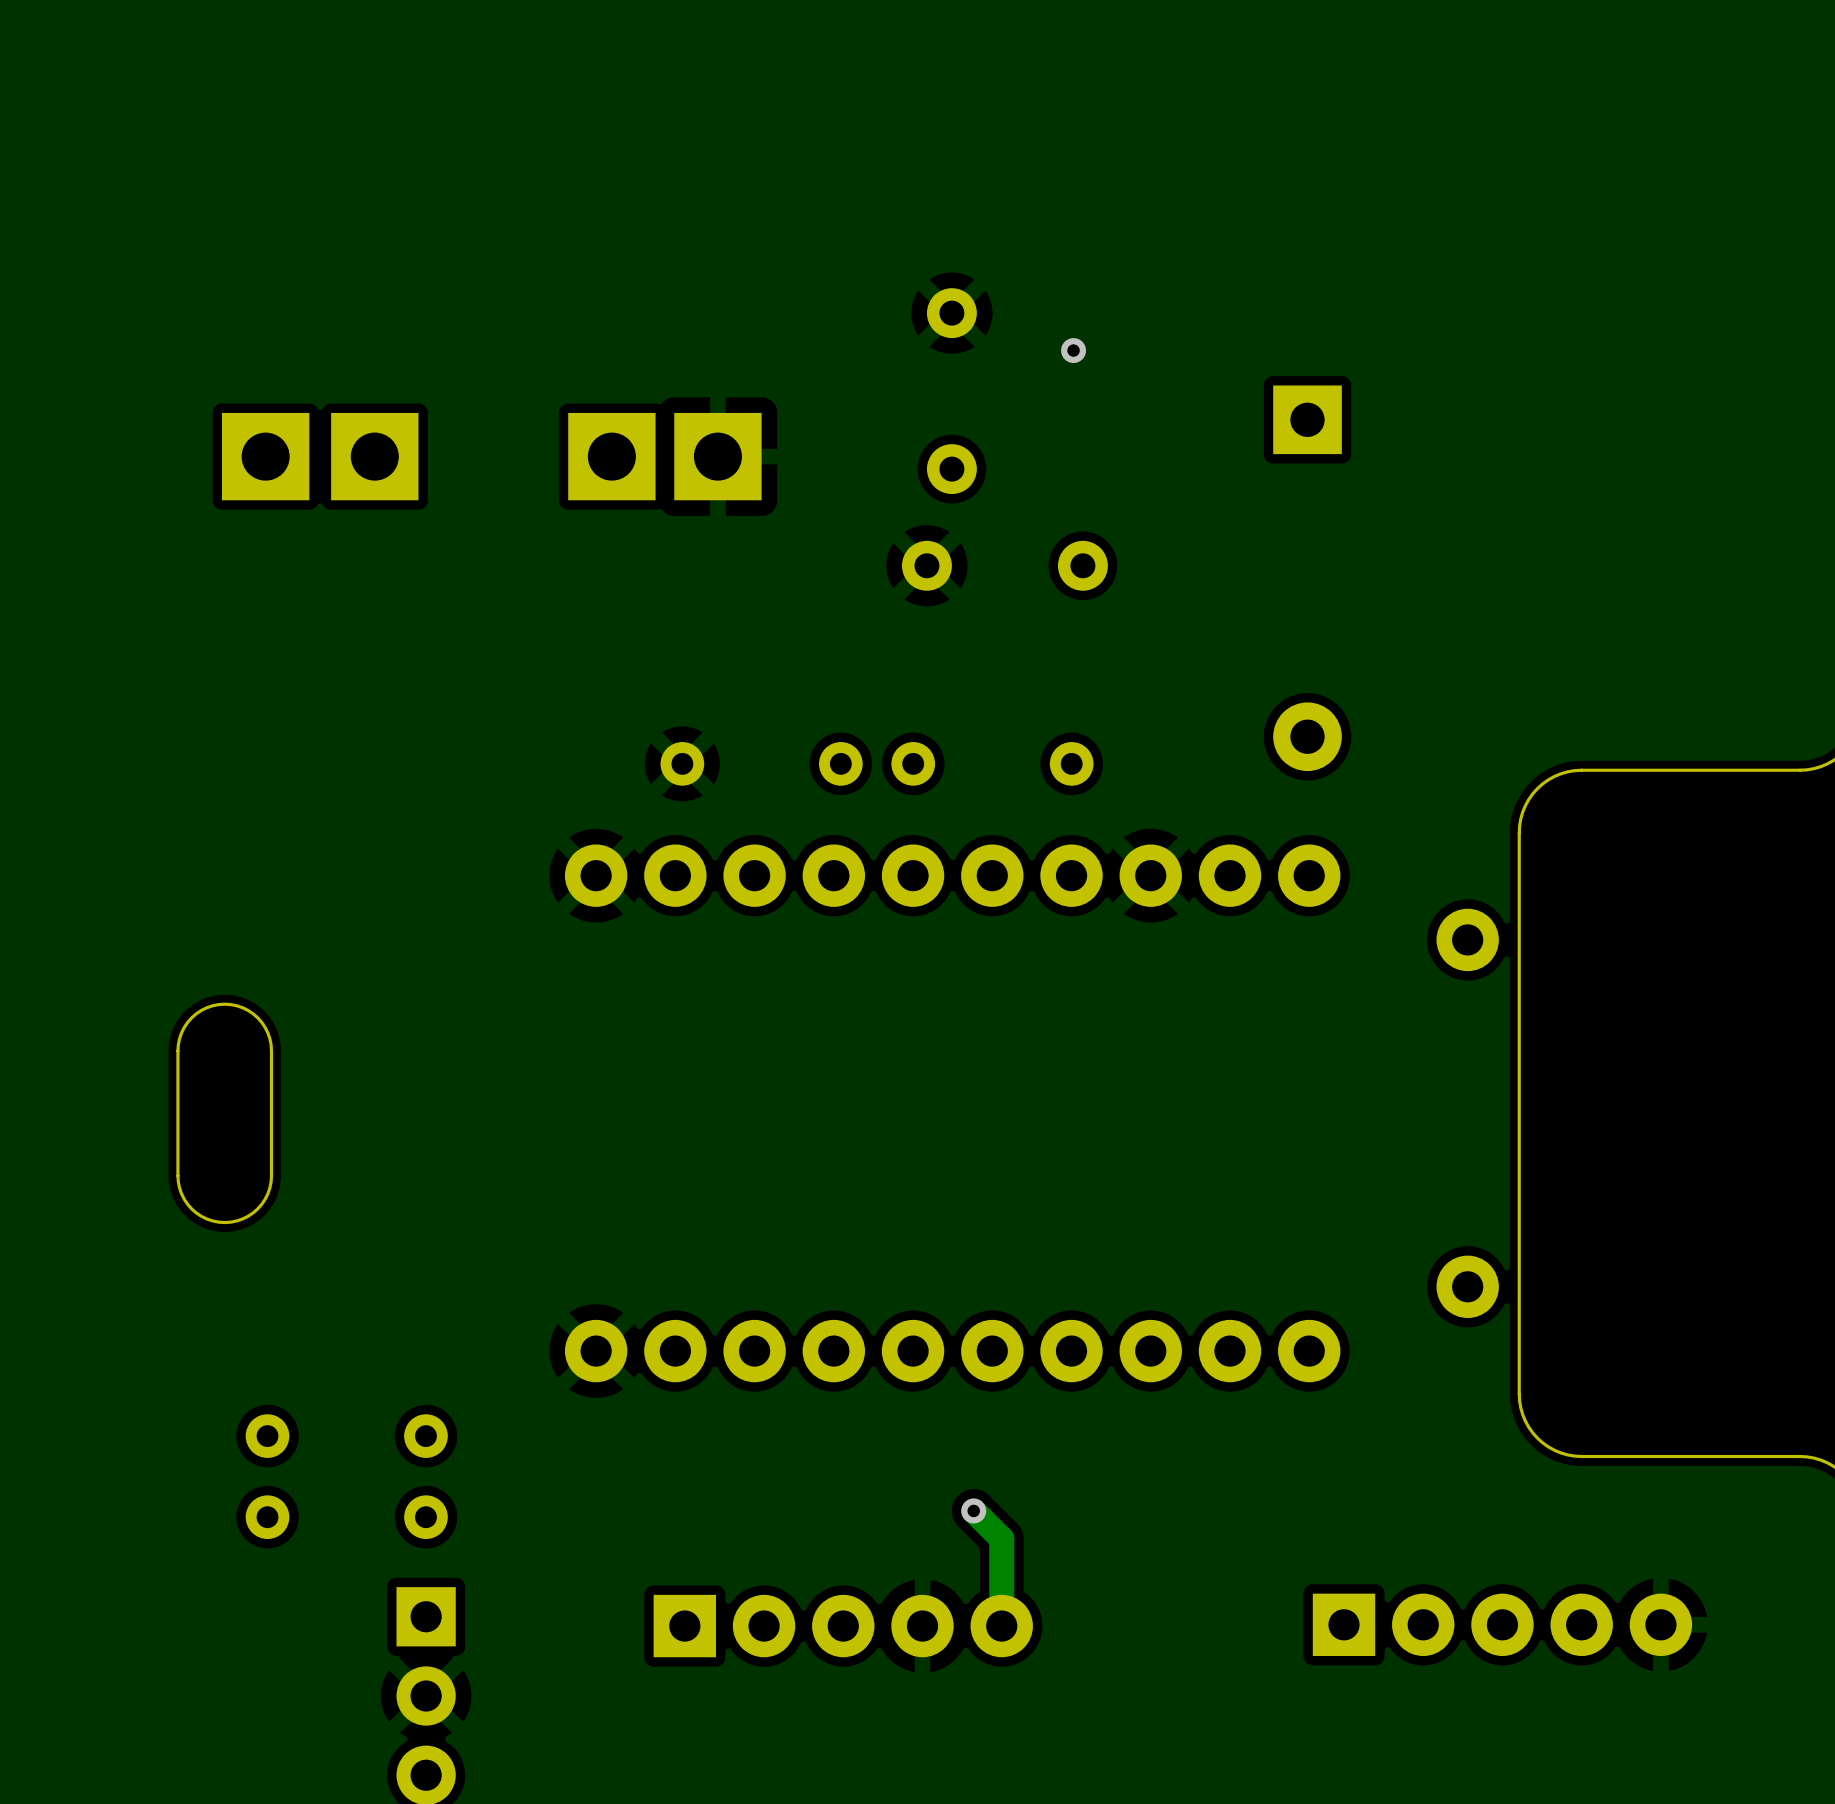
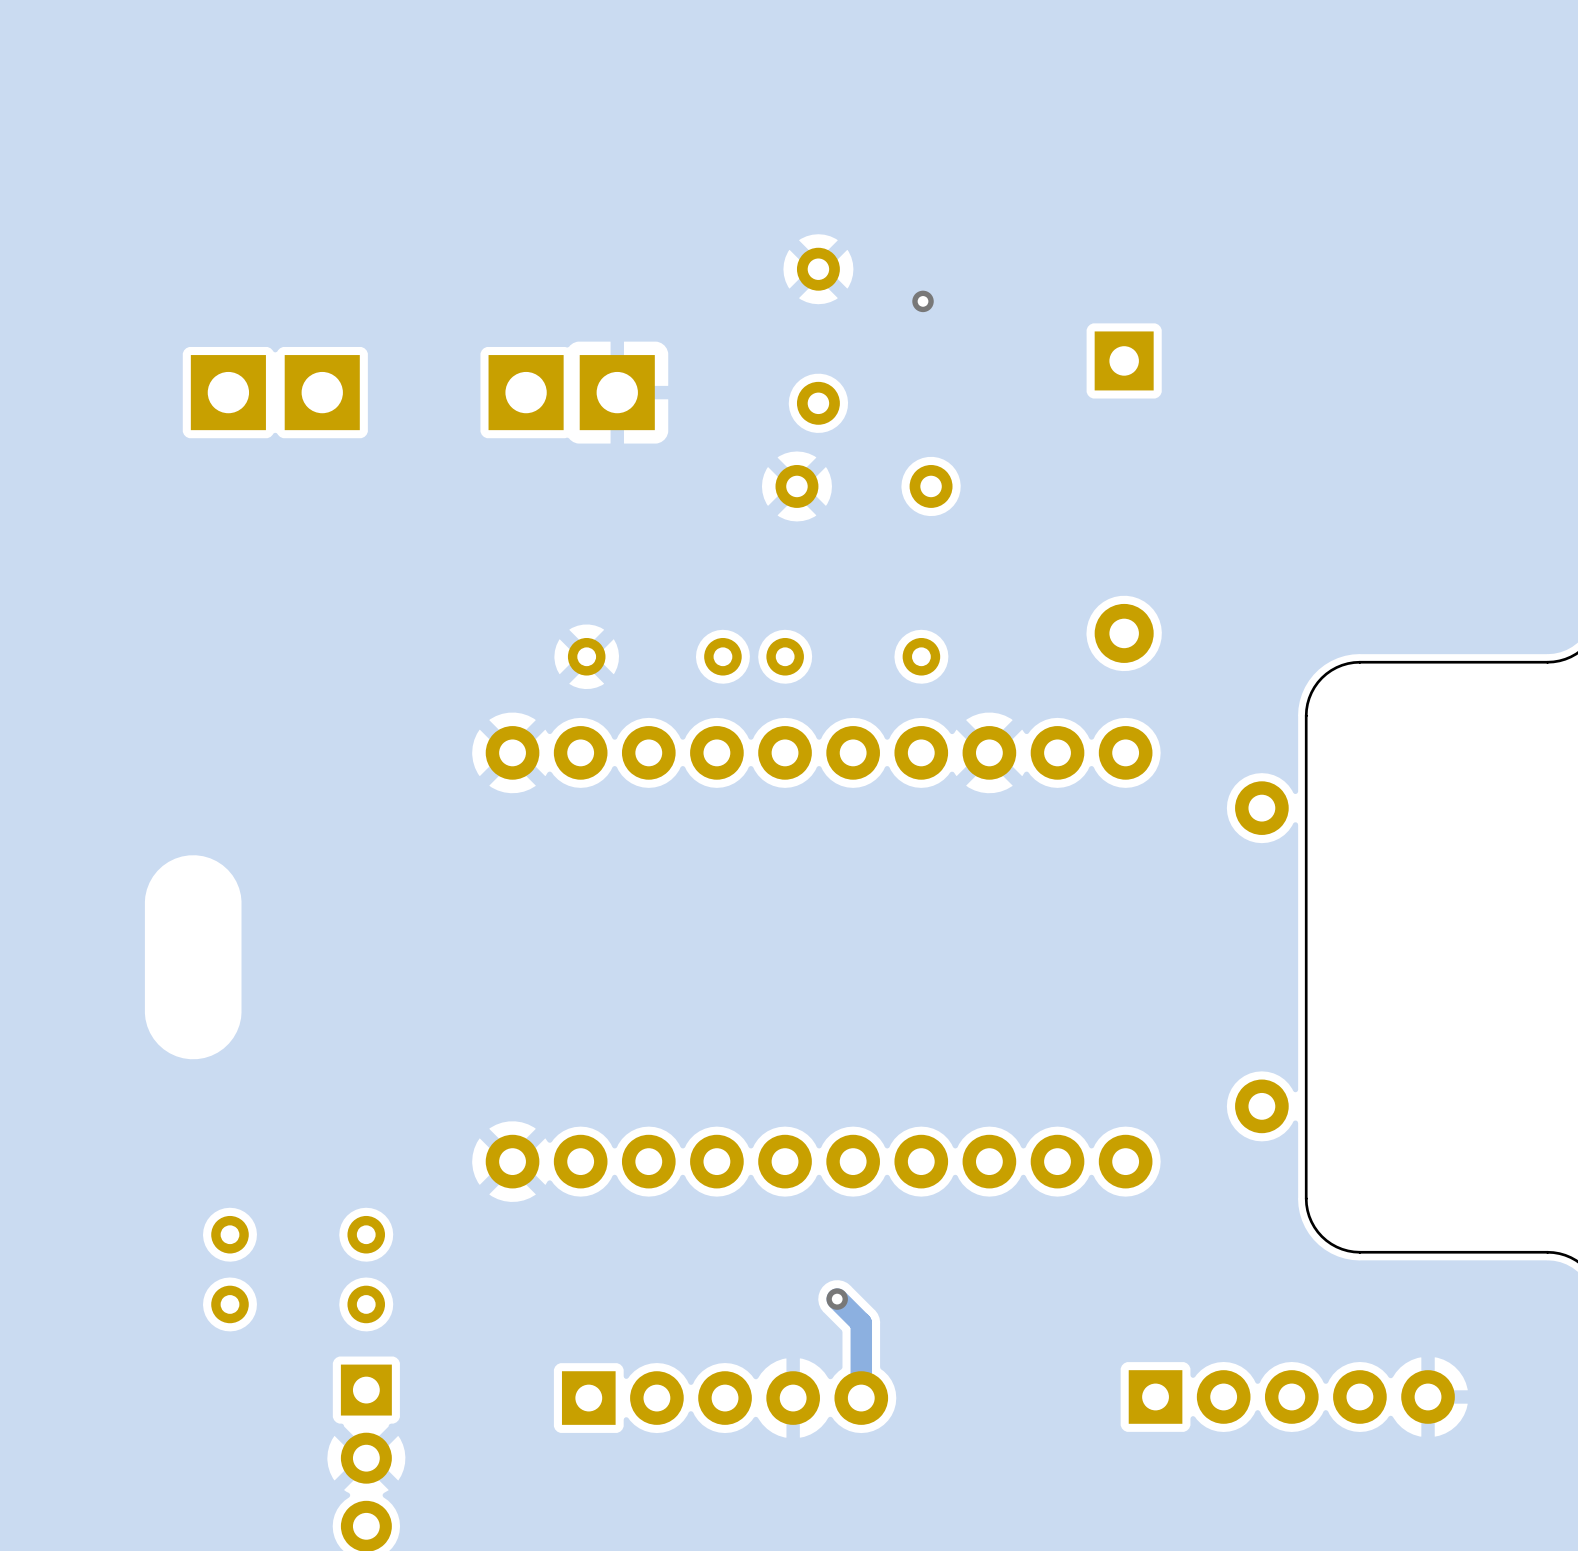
board edge: (271, 1050) (271, 1175) (267, 1193) (257, 1208) (242, 1218) (224, 1222) (206, 1218) (196, 1212) (187, 1204) (181, 1193) (178, 1181) (177, 1050) (181, 1033) (187, 1022) (201, 1010) (218, 1004) (230, 1004) (248, 1010) (261, 1022) (269, 1038) (271, 1050) -> none

